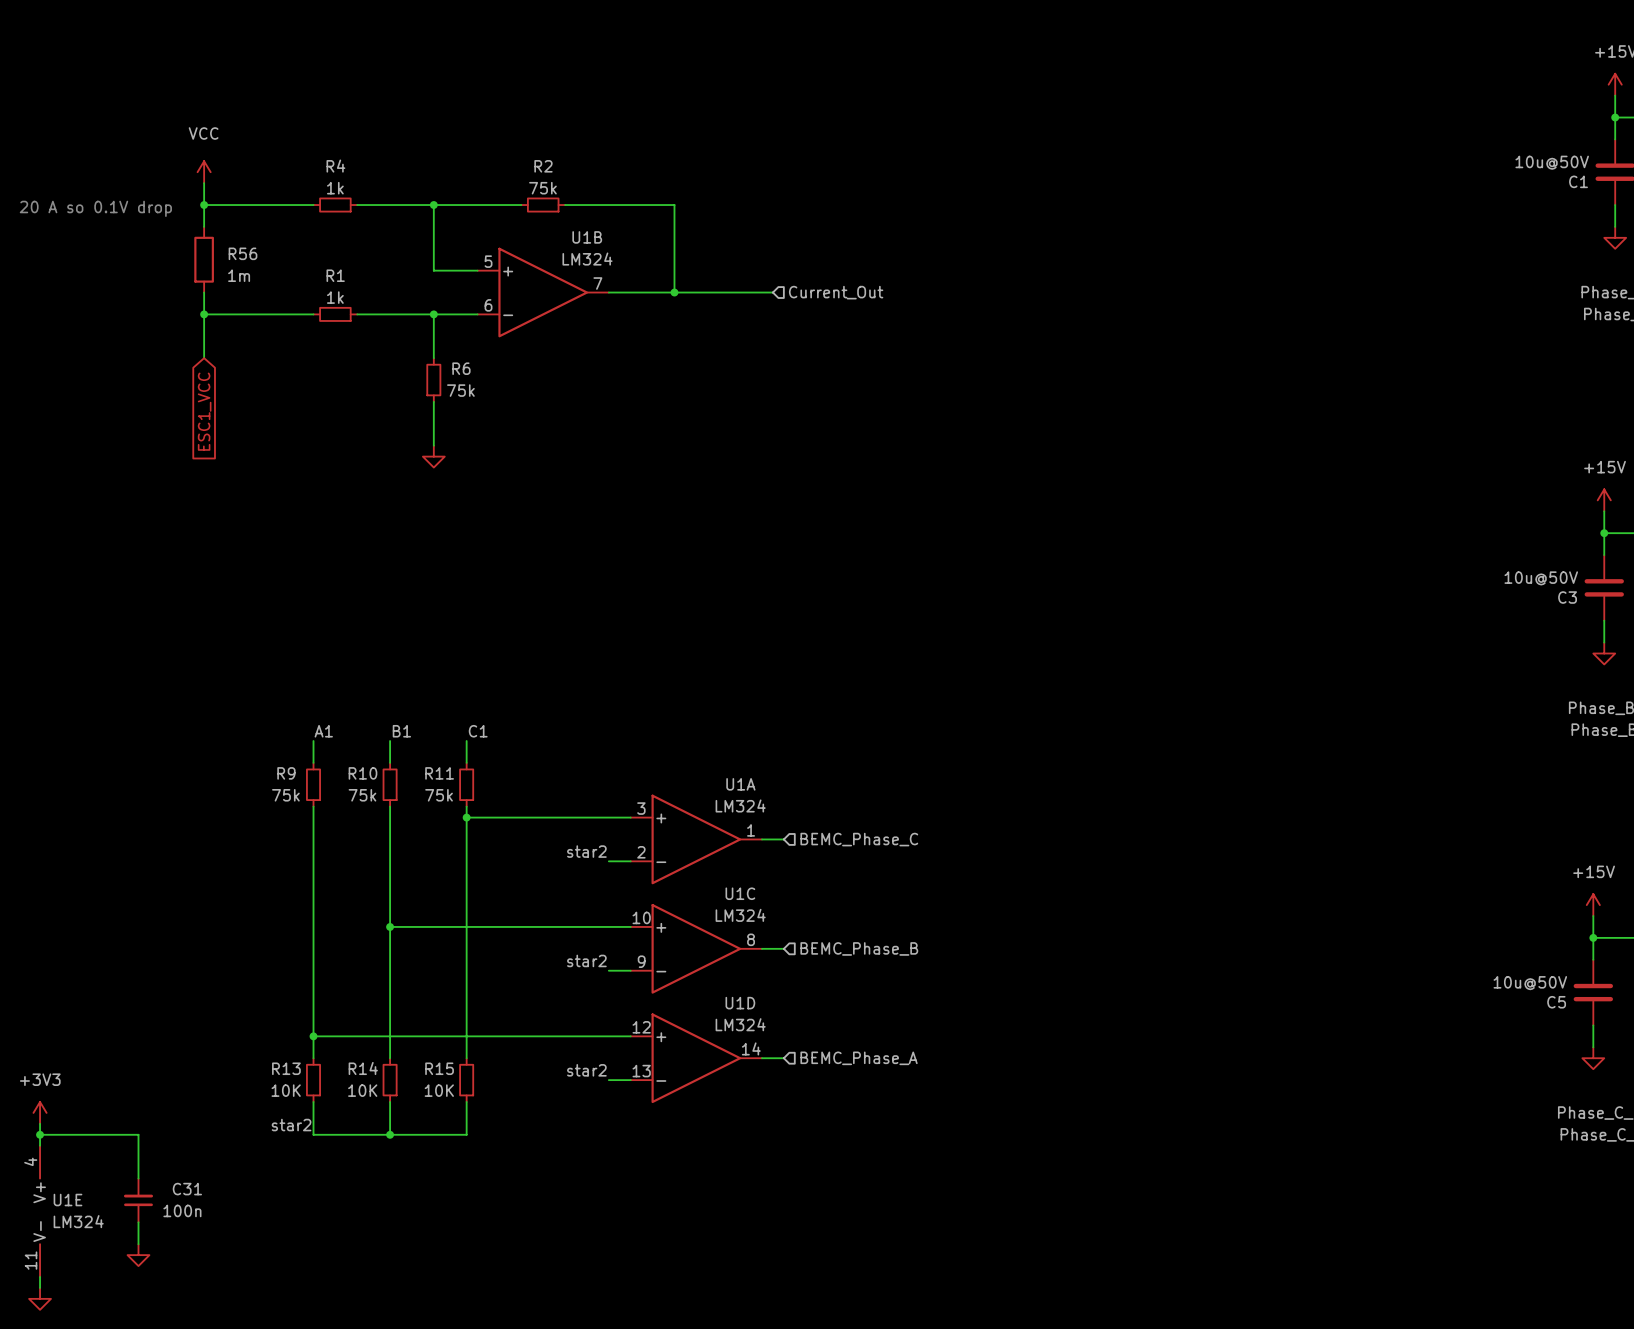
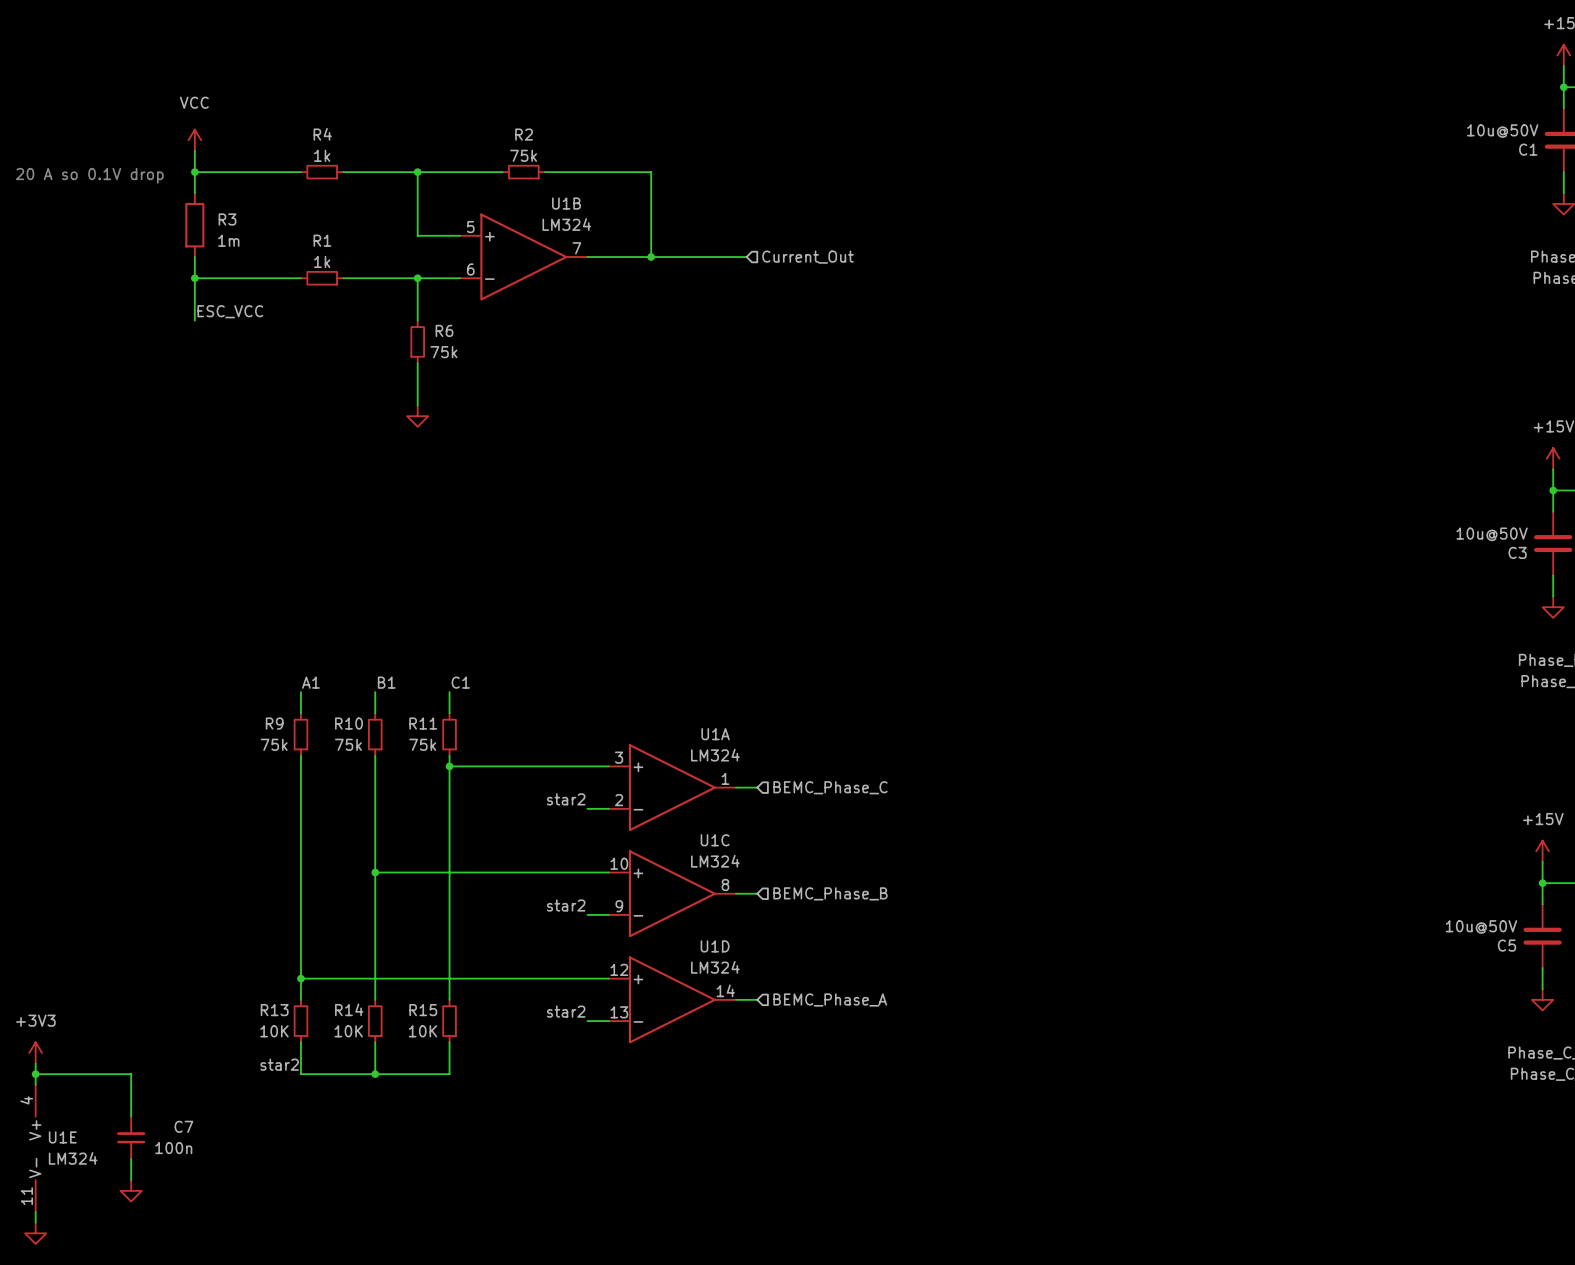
R56 name: R56 (243, 253) -> R3 (227, 219)
label: none -> ESC_VCC (230, 311)
global label: ESC1_VCC (204, 411) -> none
C31 name: C31 (187, 1189) -> C7 (183, 1126)

